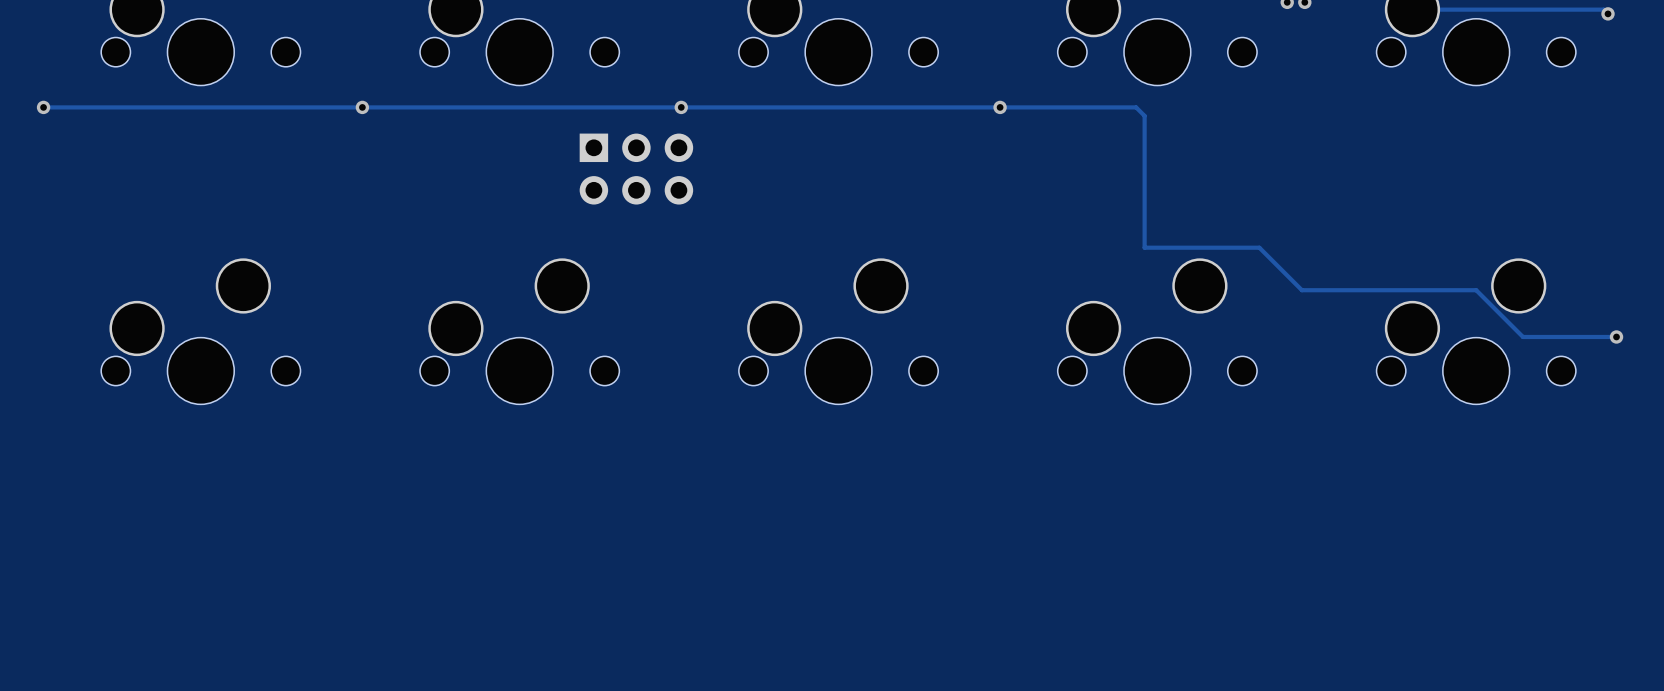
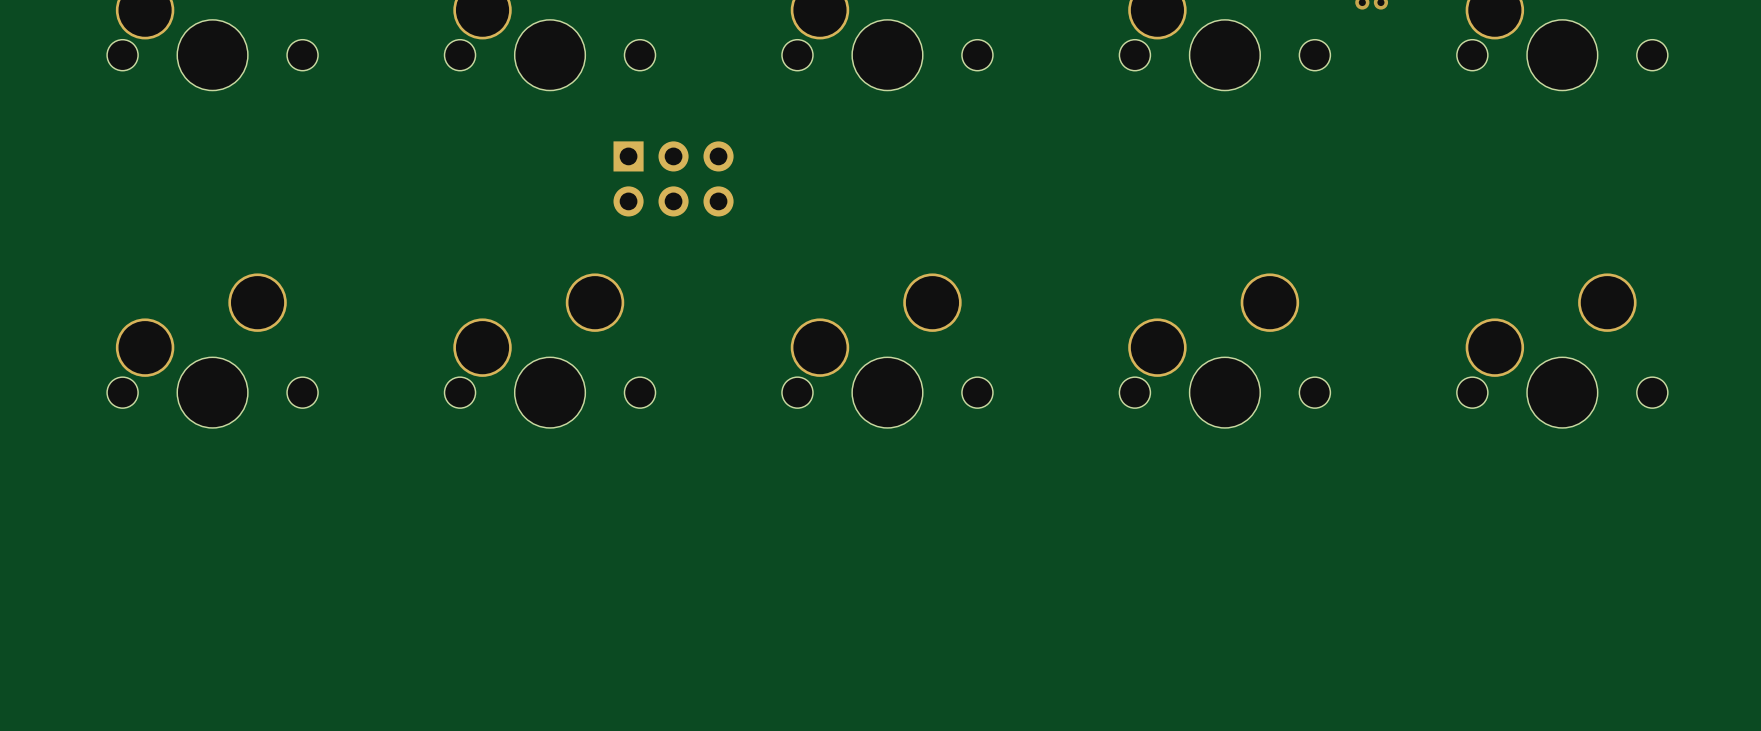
track: (1412, 9) (1603, 9) (1608, 13) -> none
via: (1608, 13) -> none
track: (43, 107) (1136, 107) (1144, 115) (1144, 247) (1259, 247) (1301, 290) (1476, 290) (1523, 336) (1616, 336) -> none
via: (43, 107) -> none
via: (362, 107) -> none
via: (681, 107) -> none
via: (1000, 107) -> none
via: (1616, 336) -> none

